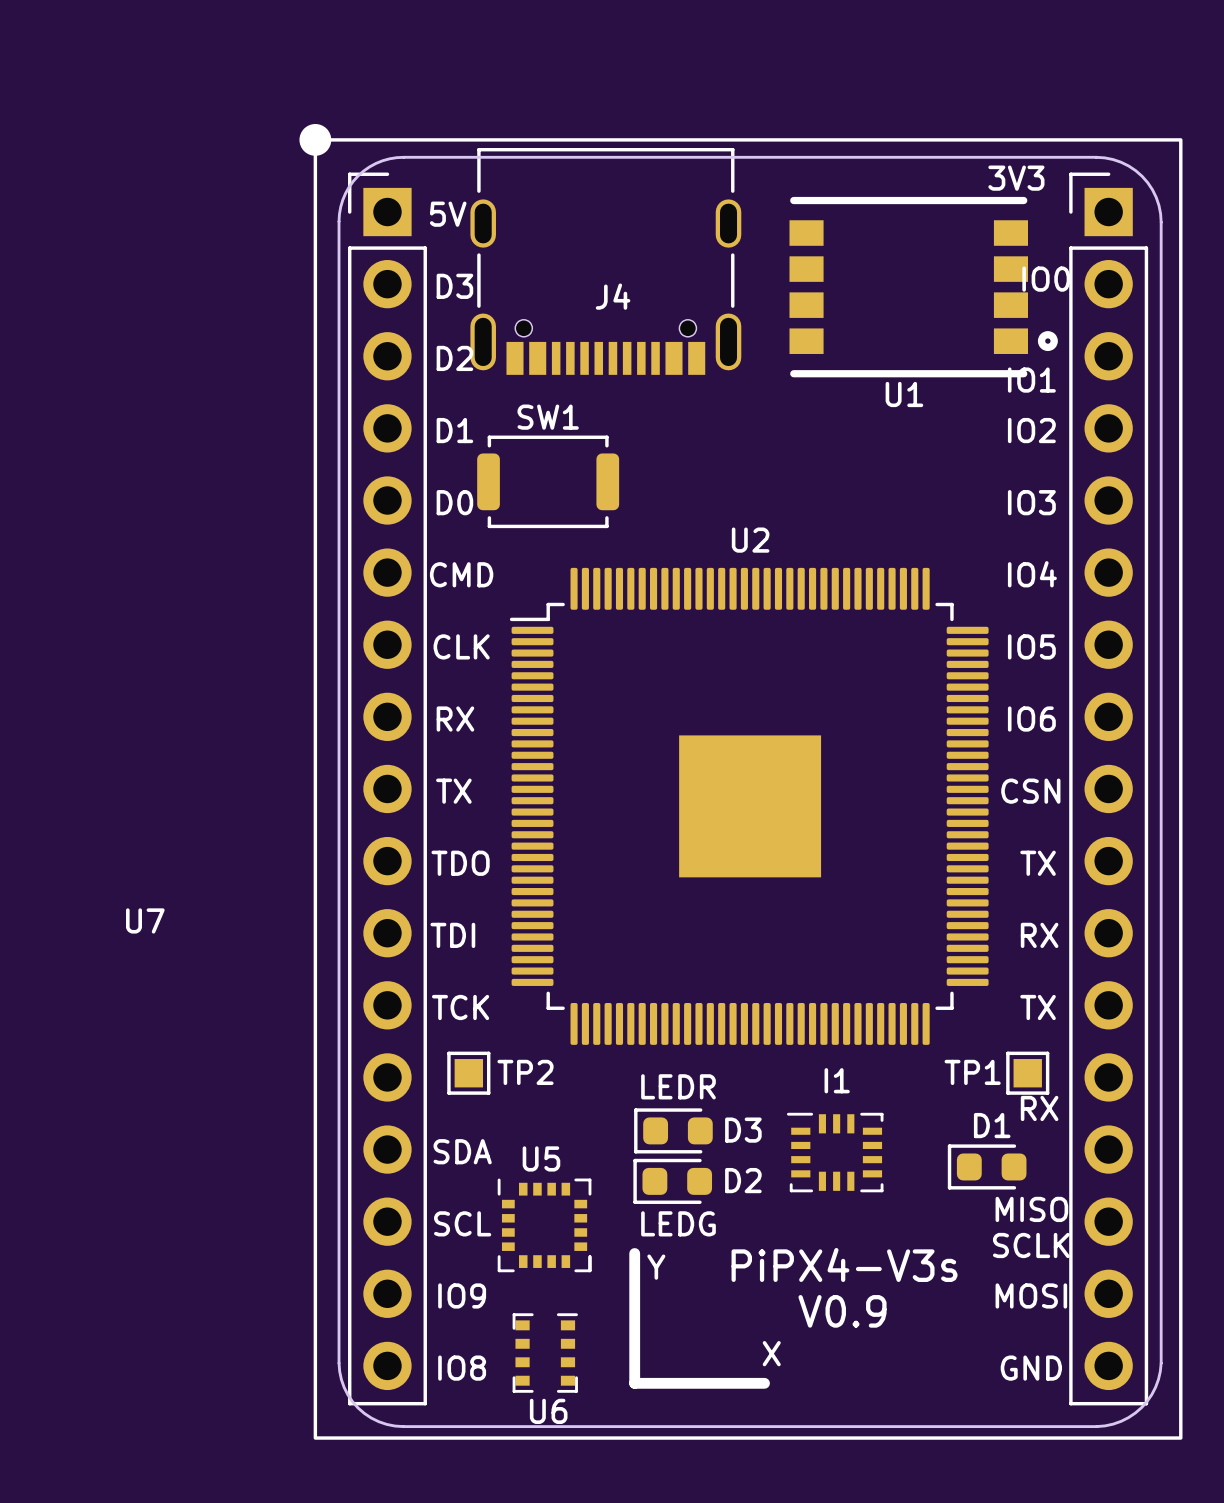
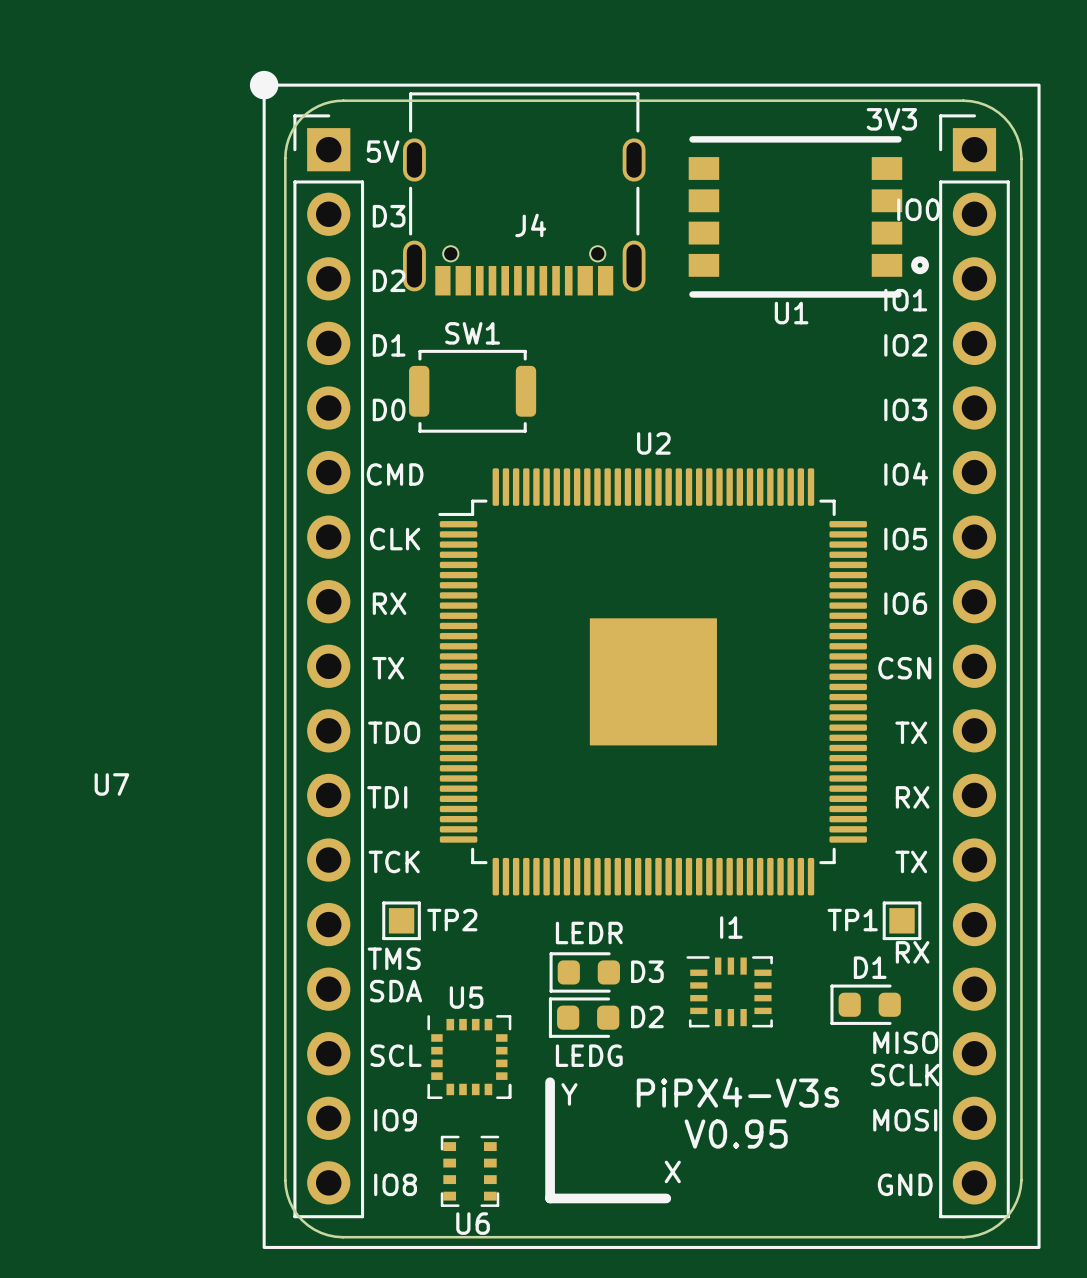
text: none -> TMS (394, 958)
text: V0.9 (842, 1311) -> V0.95 (736, 1134)

